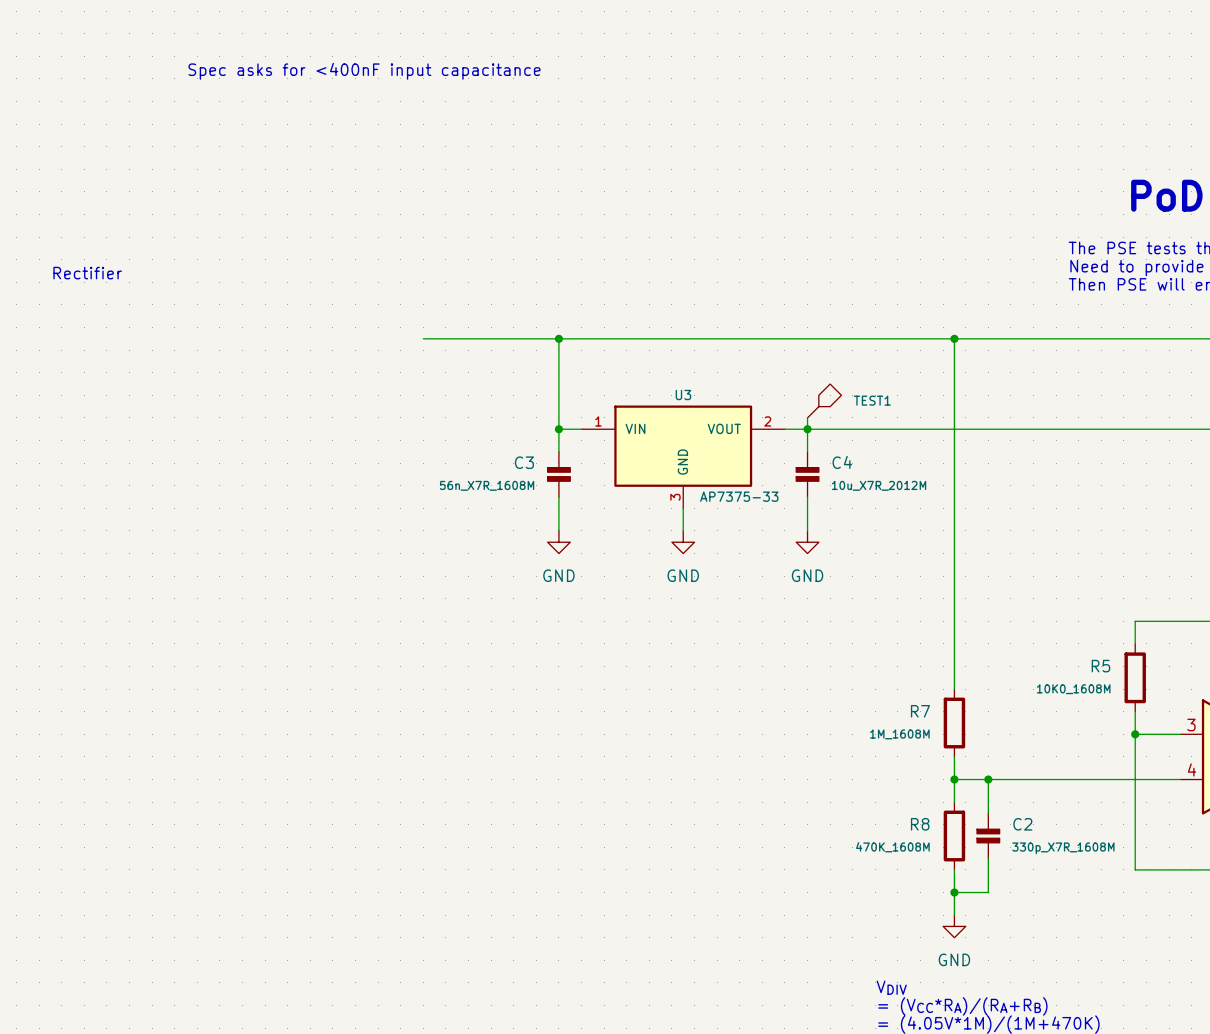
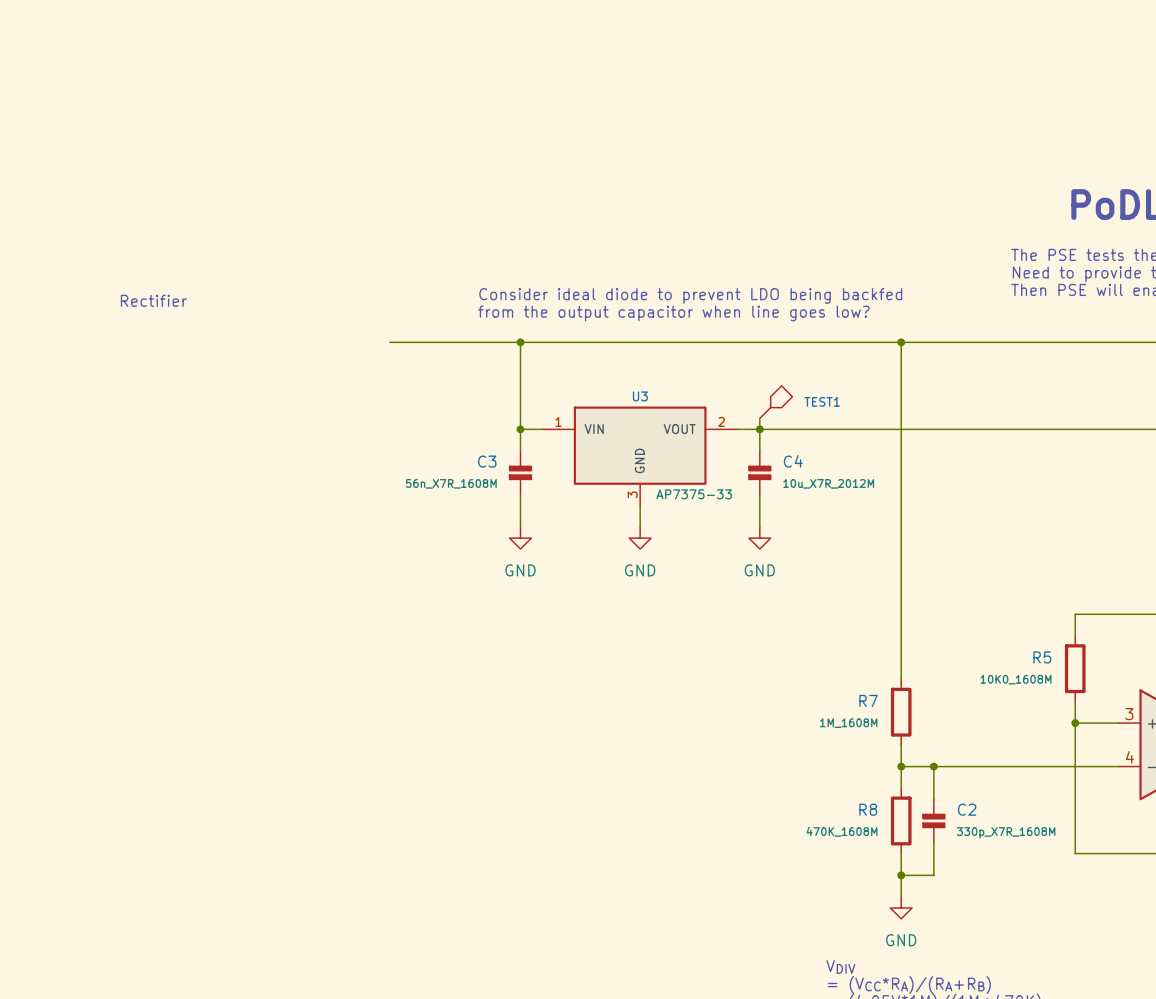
text: Spec asks for <400nF input capacitance (364, 71) -> none
text position: Rectifier (87, 273) -> Rectifier (153, 300)
text: none -> Consider ideal diode to prevent LDO being backfed (690, 295)
text: none -> from the output capacitor when line goes low? (673, 313)

